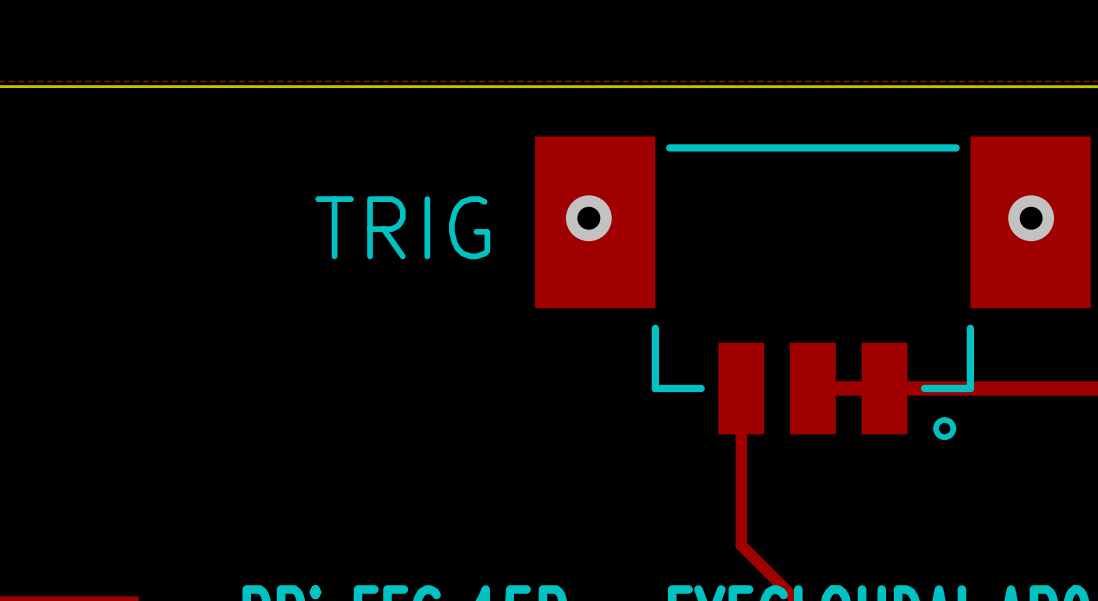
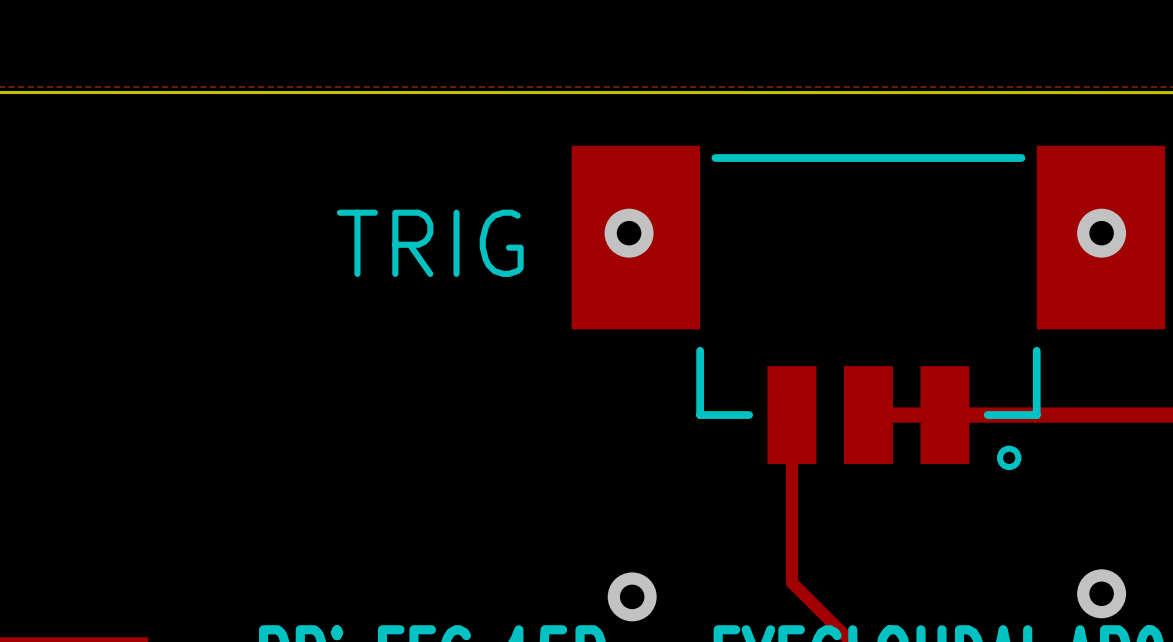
via: none -> (1101, 593)
via: none -> (632, 596)

